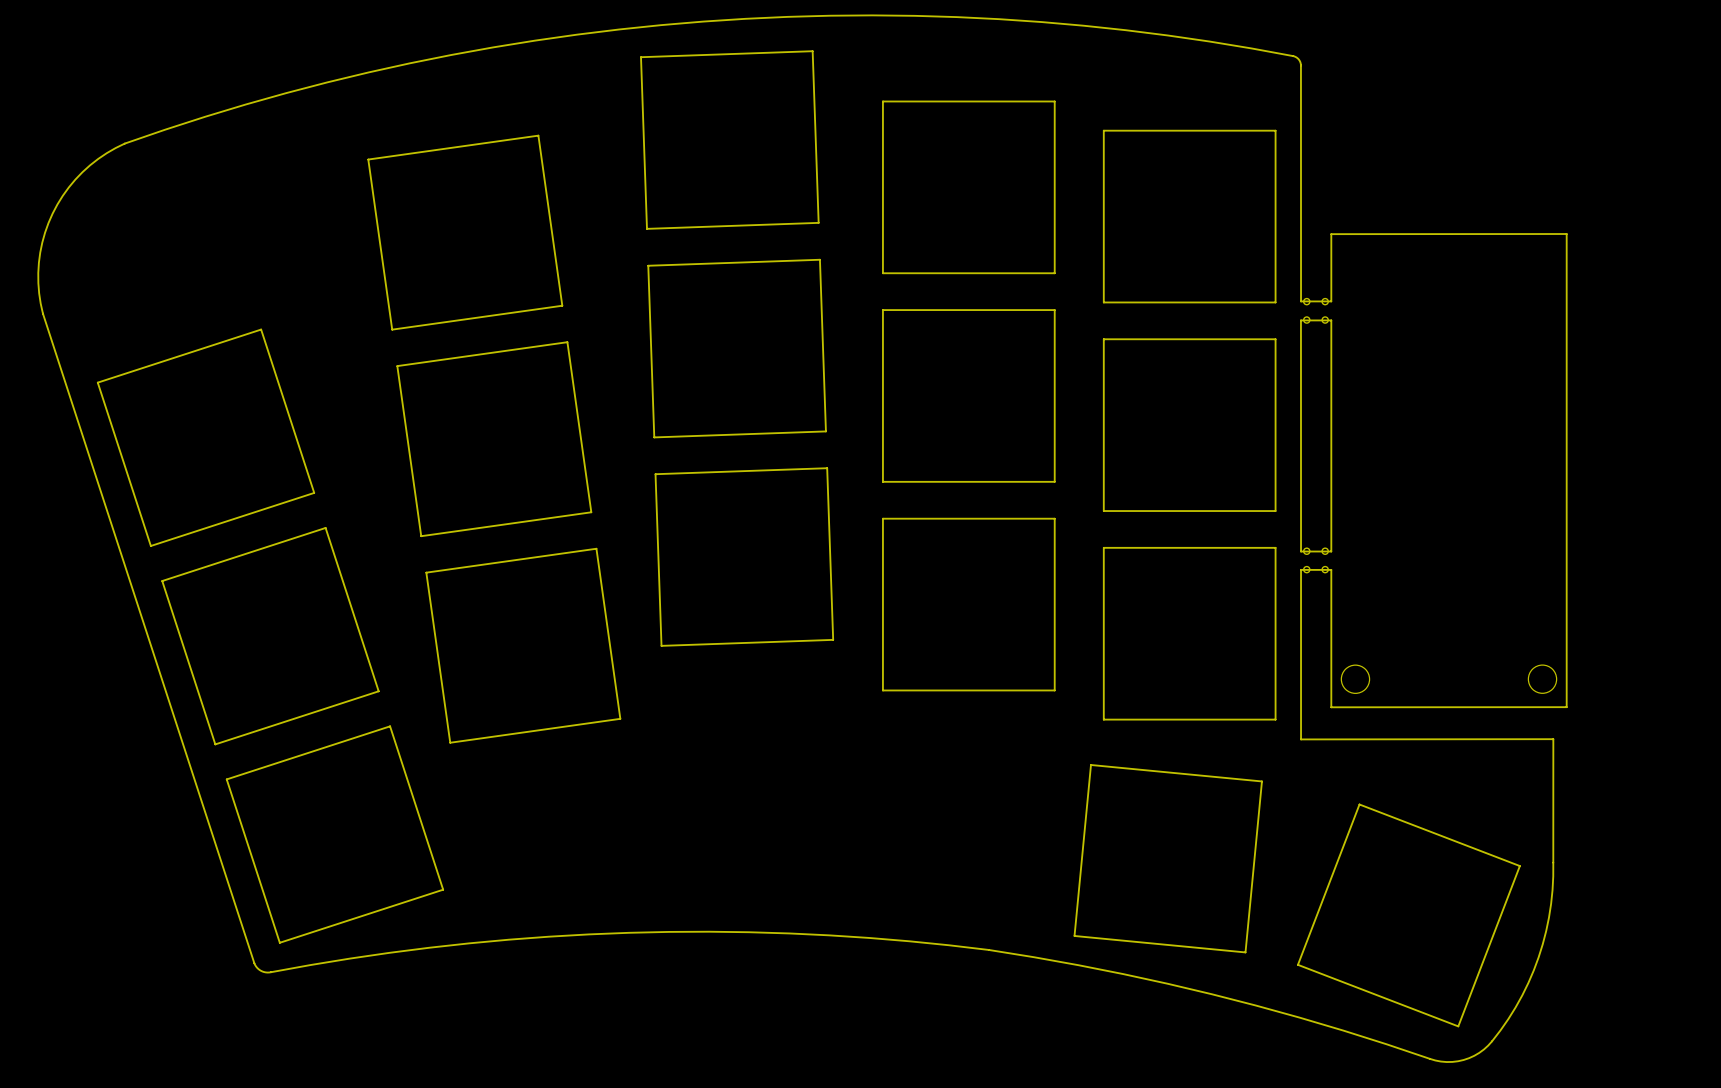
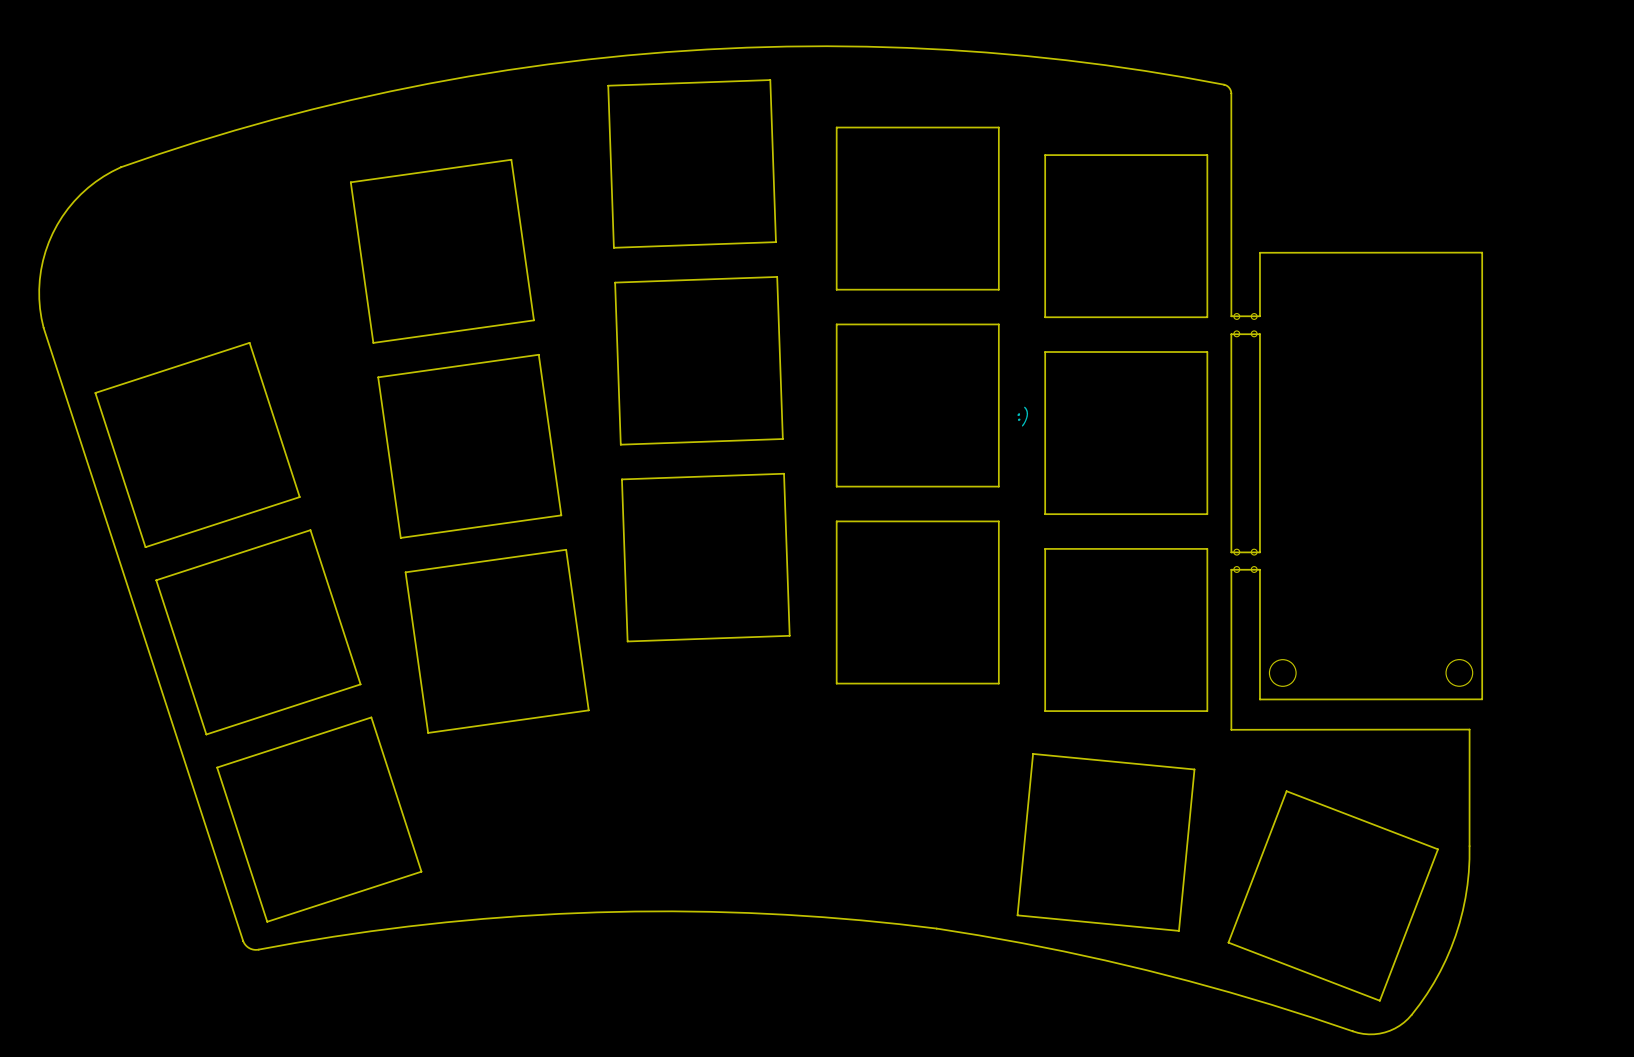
drawing: none -> [1017, 406, 1029, 427]

